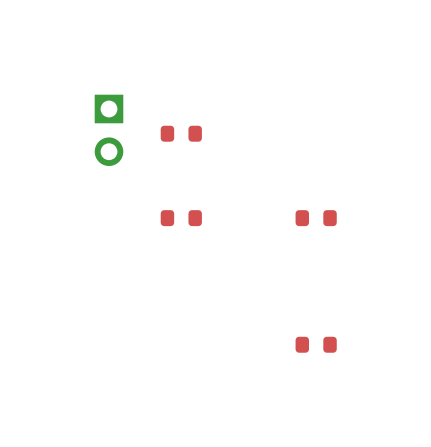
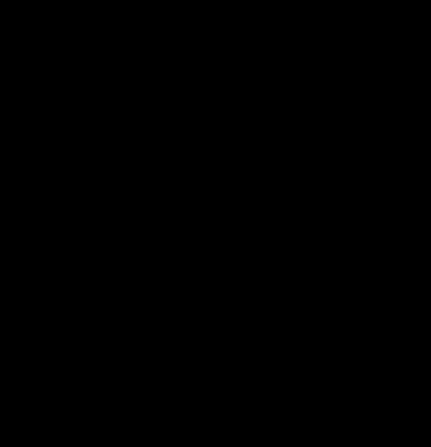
part: (109, 130) -> none
part: (181, 133) -> none
part: (181, 218) -> none
part: (316, 218) -> none
part: (316, 344) -> none

